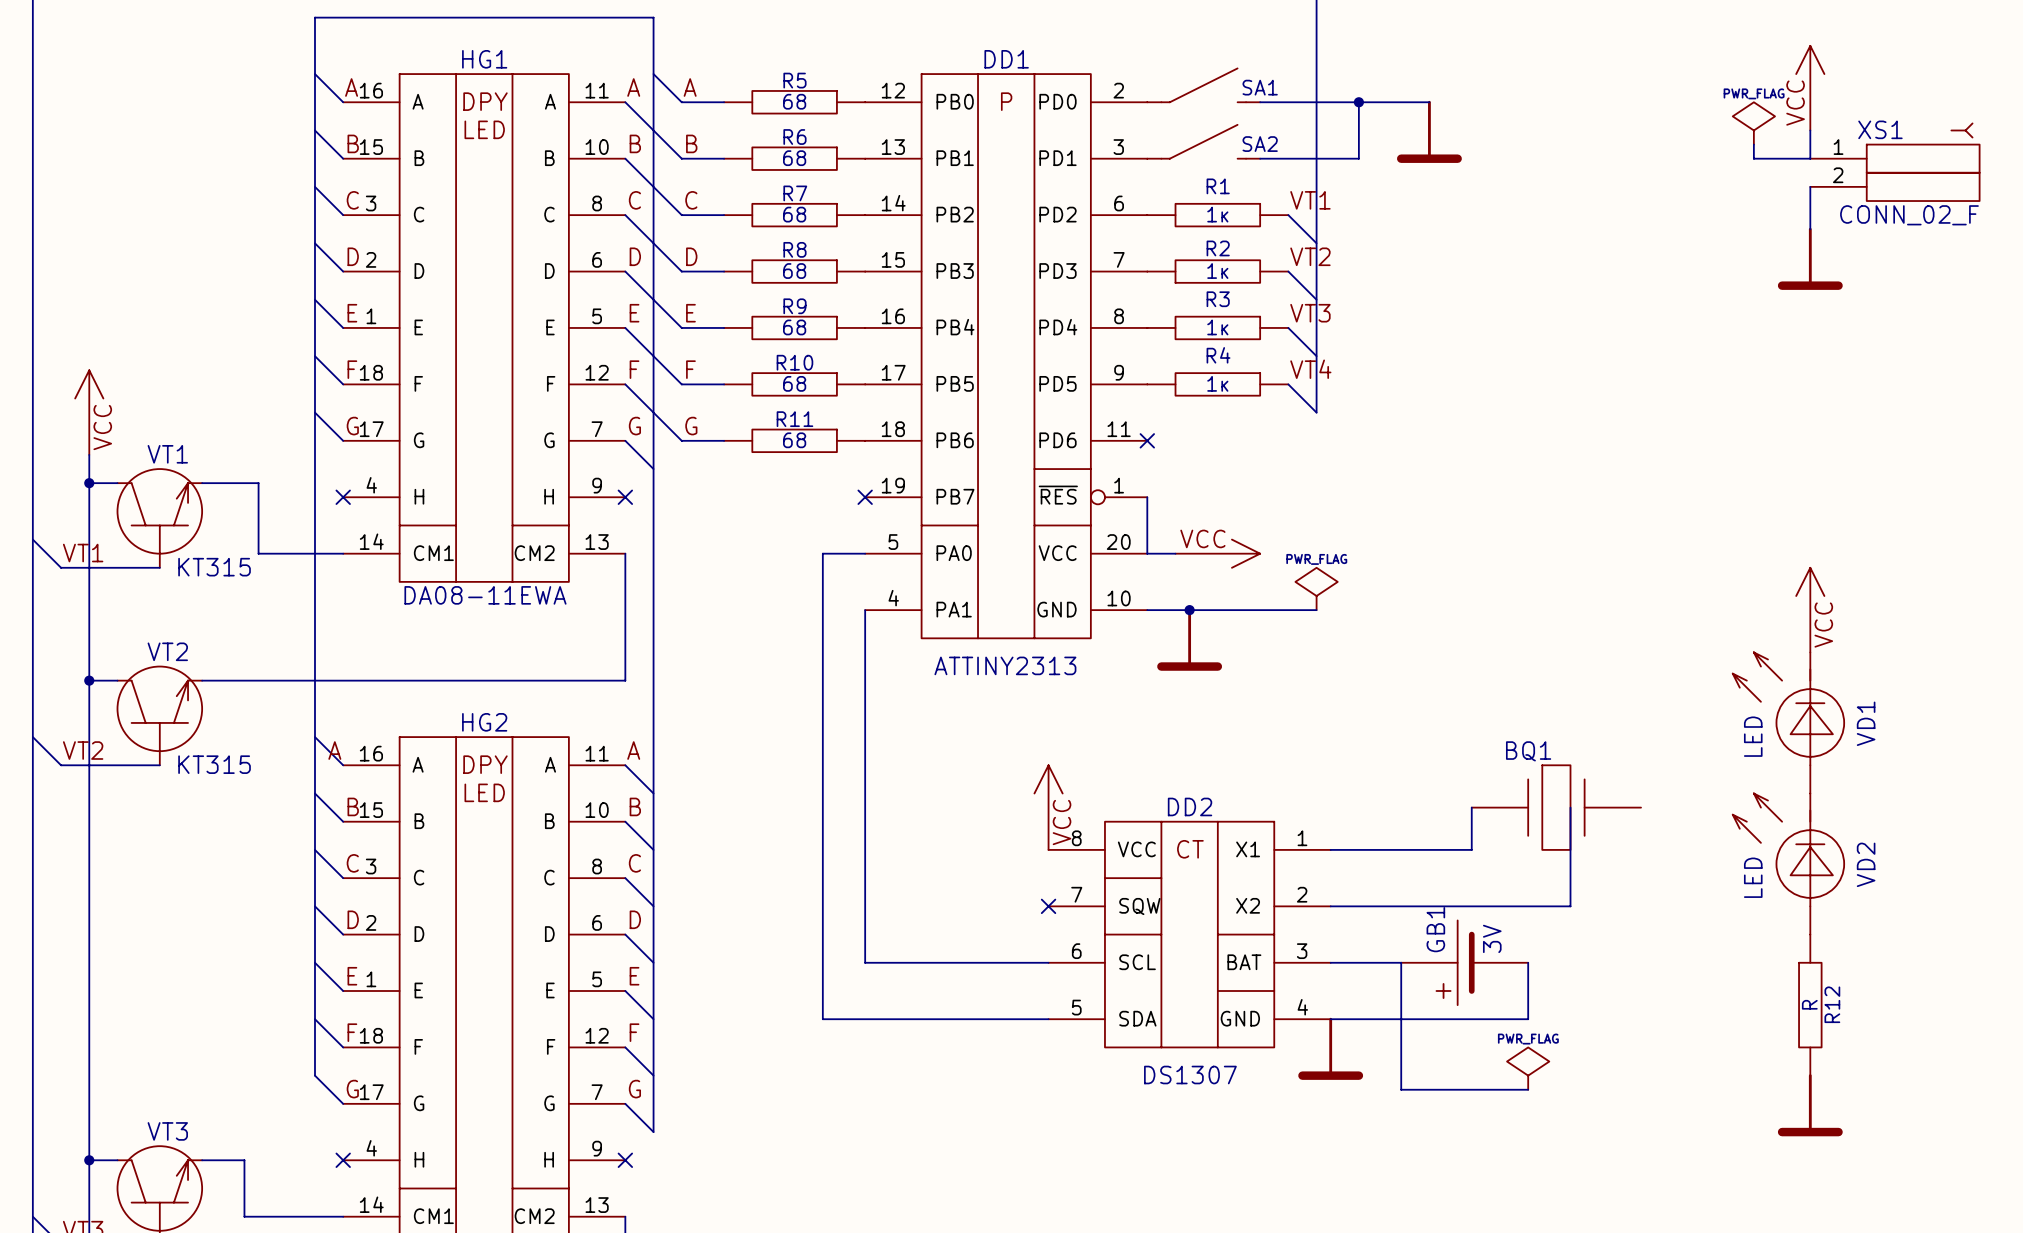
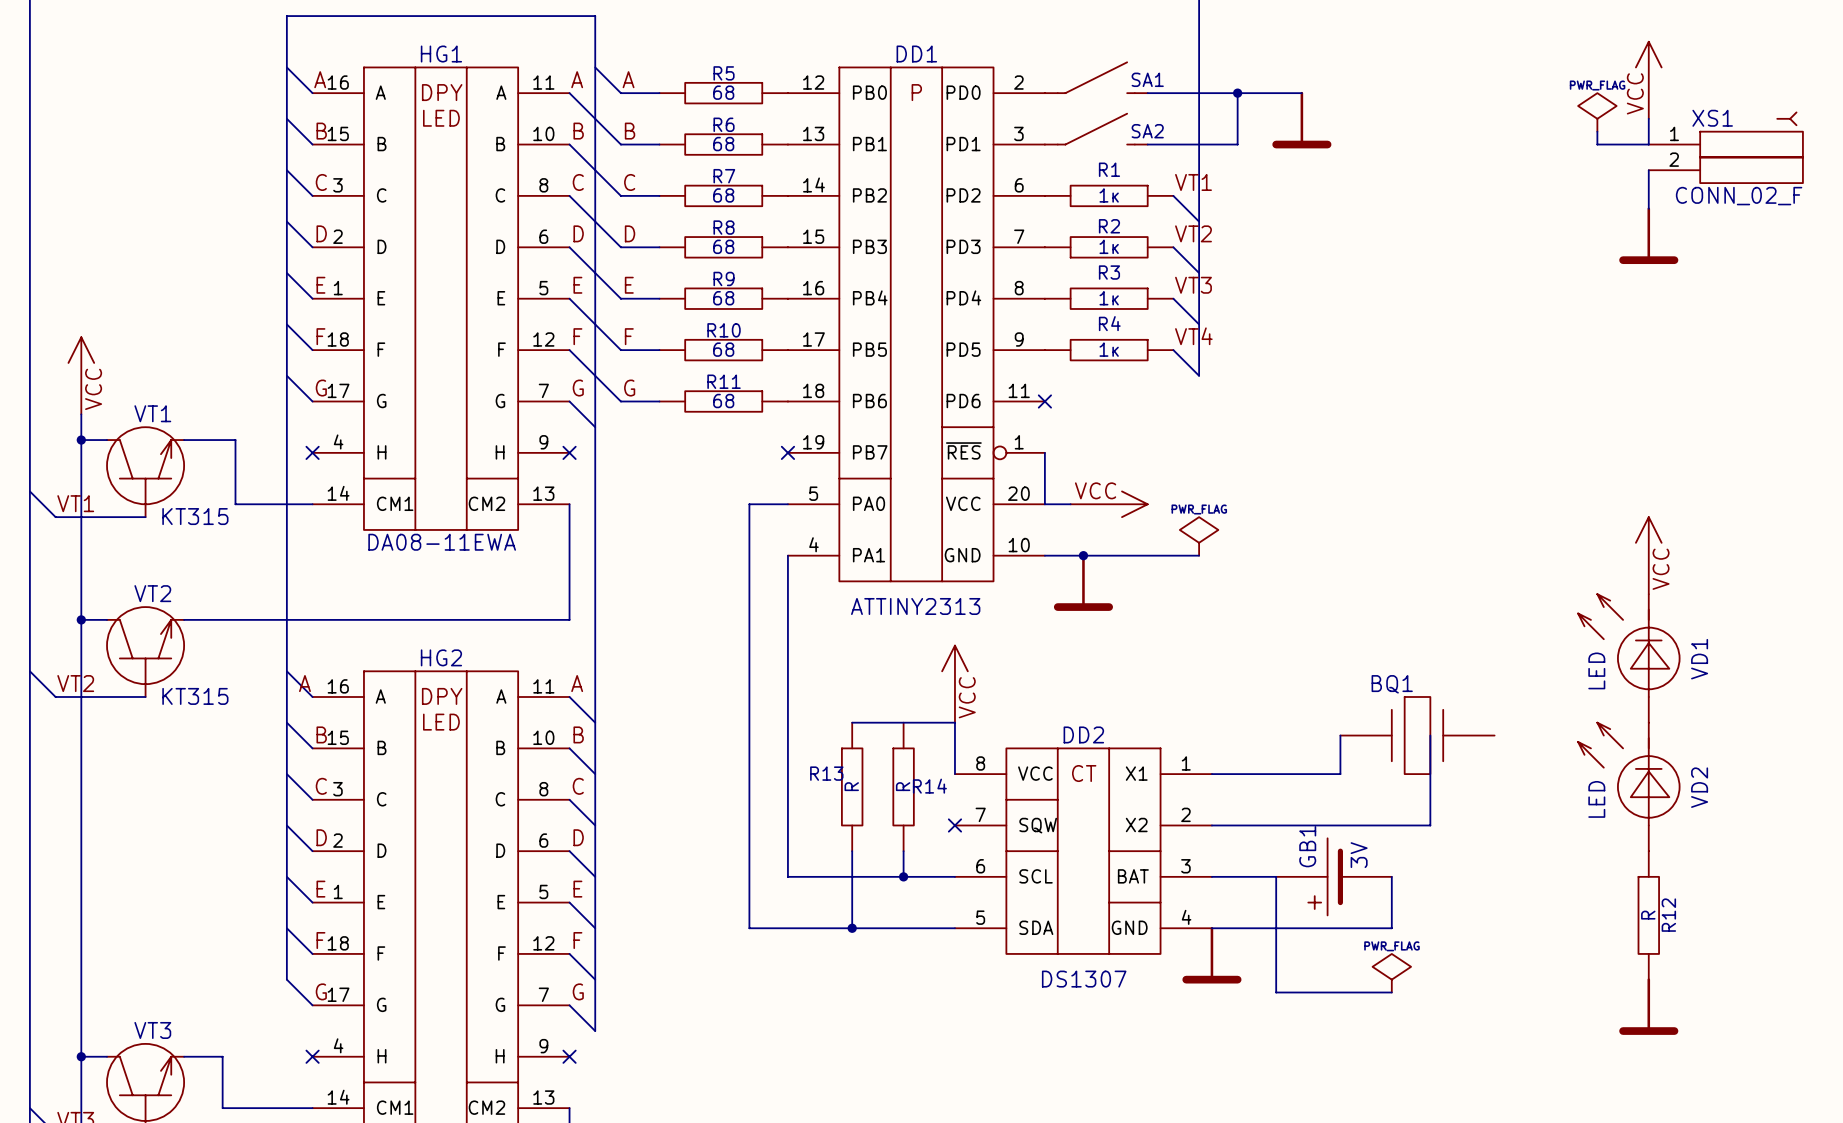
wire: none -> (852, 722) (954, 722) (954, 774)
power symbol position: (1048, 807) -> (954, 684)
R13: none -> R (852, 786)
R14: none -> R (903, 786)
wire: none -> (852, 851) (852, 928)
wire: none -> (903, 851) (903, 876)
junction: none -> (903, 876)
junction: none -> (852, 928)

